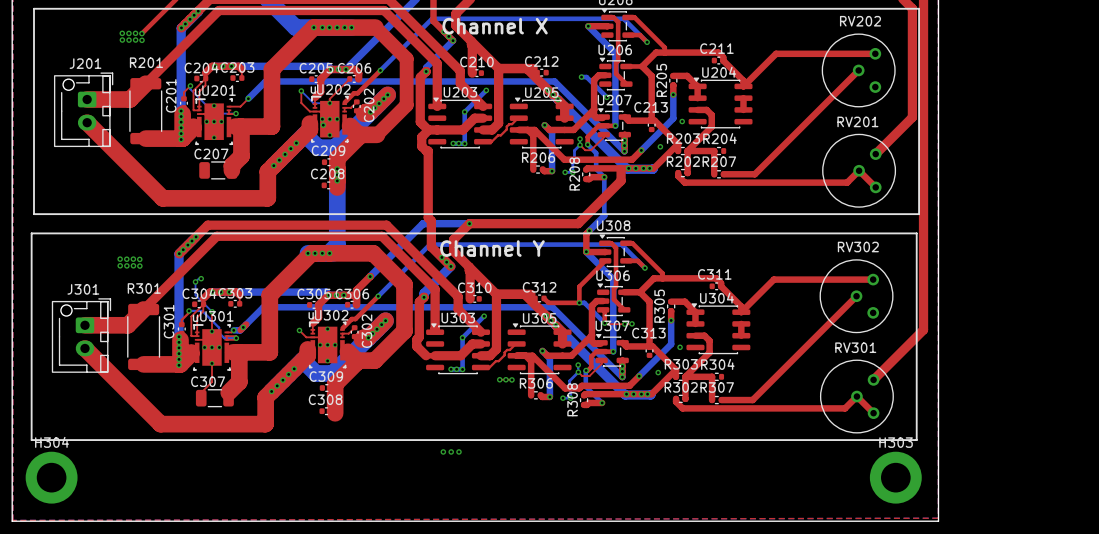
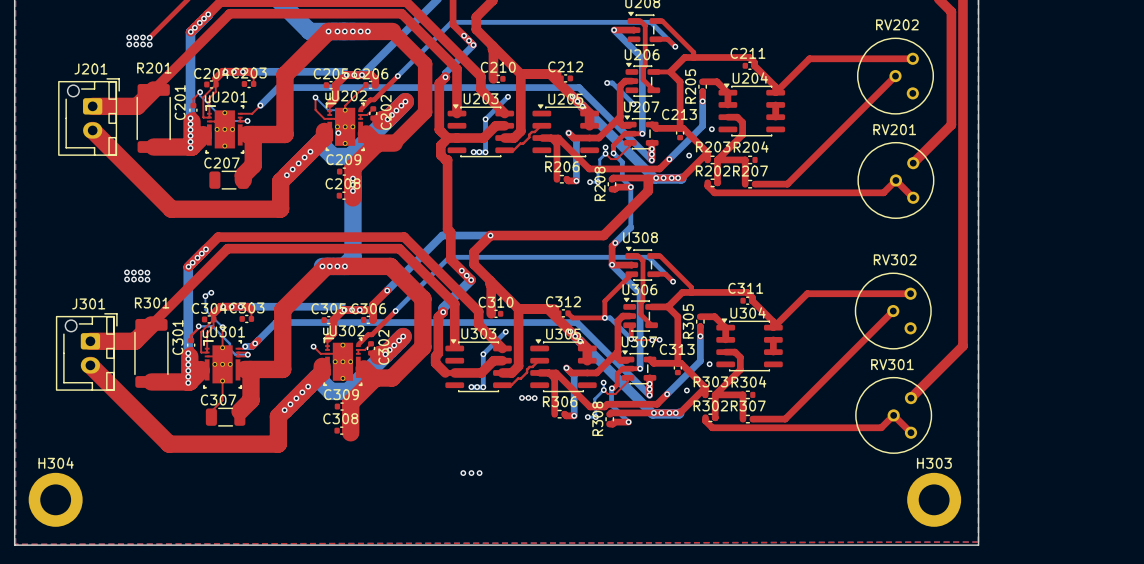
line: (34, 8) (919, 8) (919, 214) (34, 214) (34, 8) -> none
text: Channel X (495, 26) -> none
line: (31, 233) (916, 233) (916, 440) (31, 440) (31, 233) -> none
text: Channel Y (492, 248) -> none

